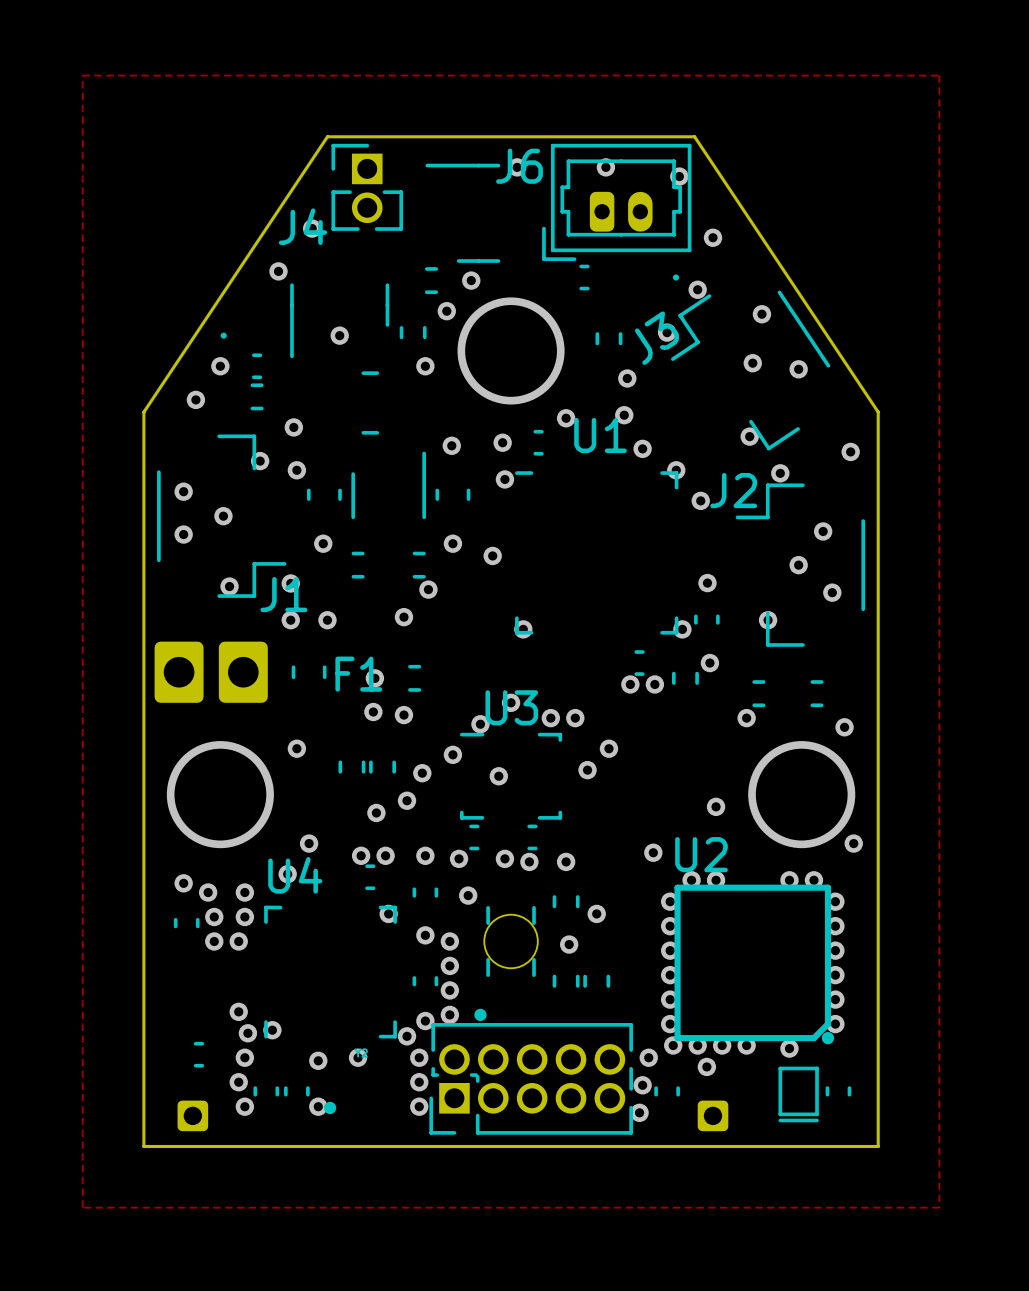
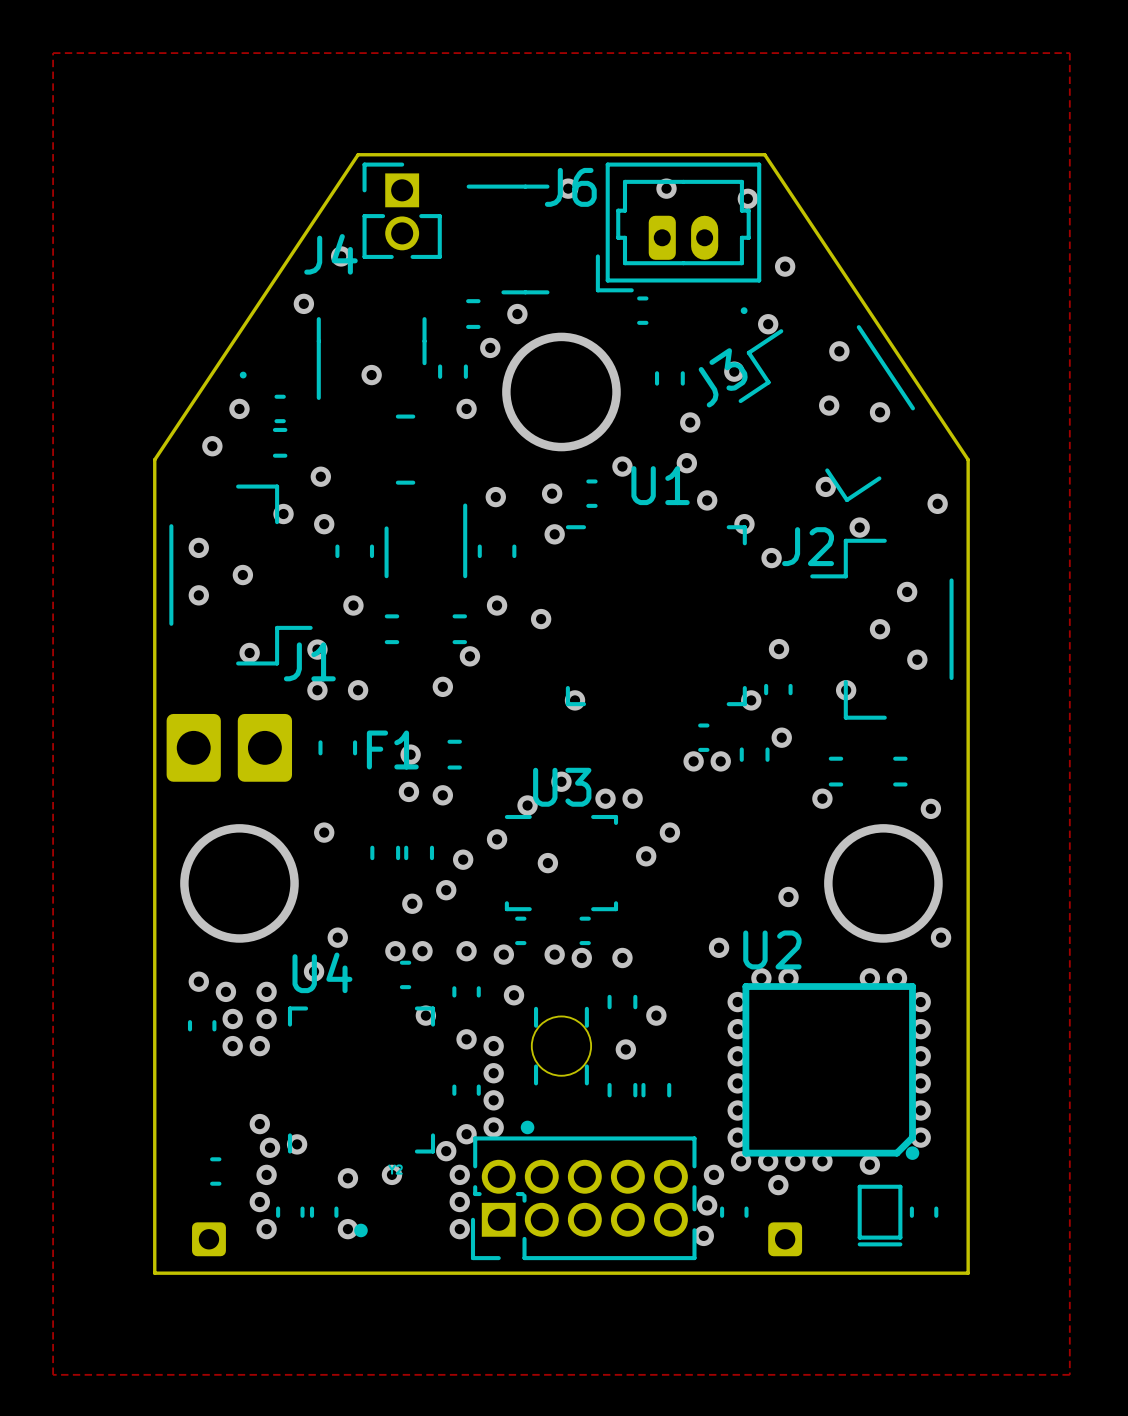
zone outline: (82, 75) (82, 1207) (939, 1207) (939, 75) (82, 75) -> (53, 53) (53, 1374) (1069, 1374) (1069, 53) (53, 53)

